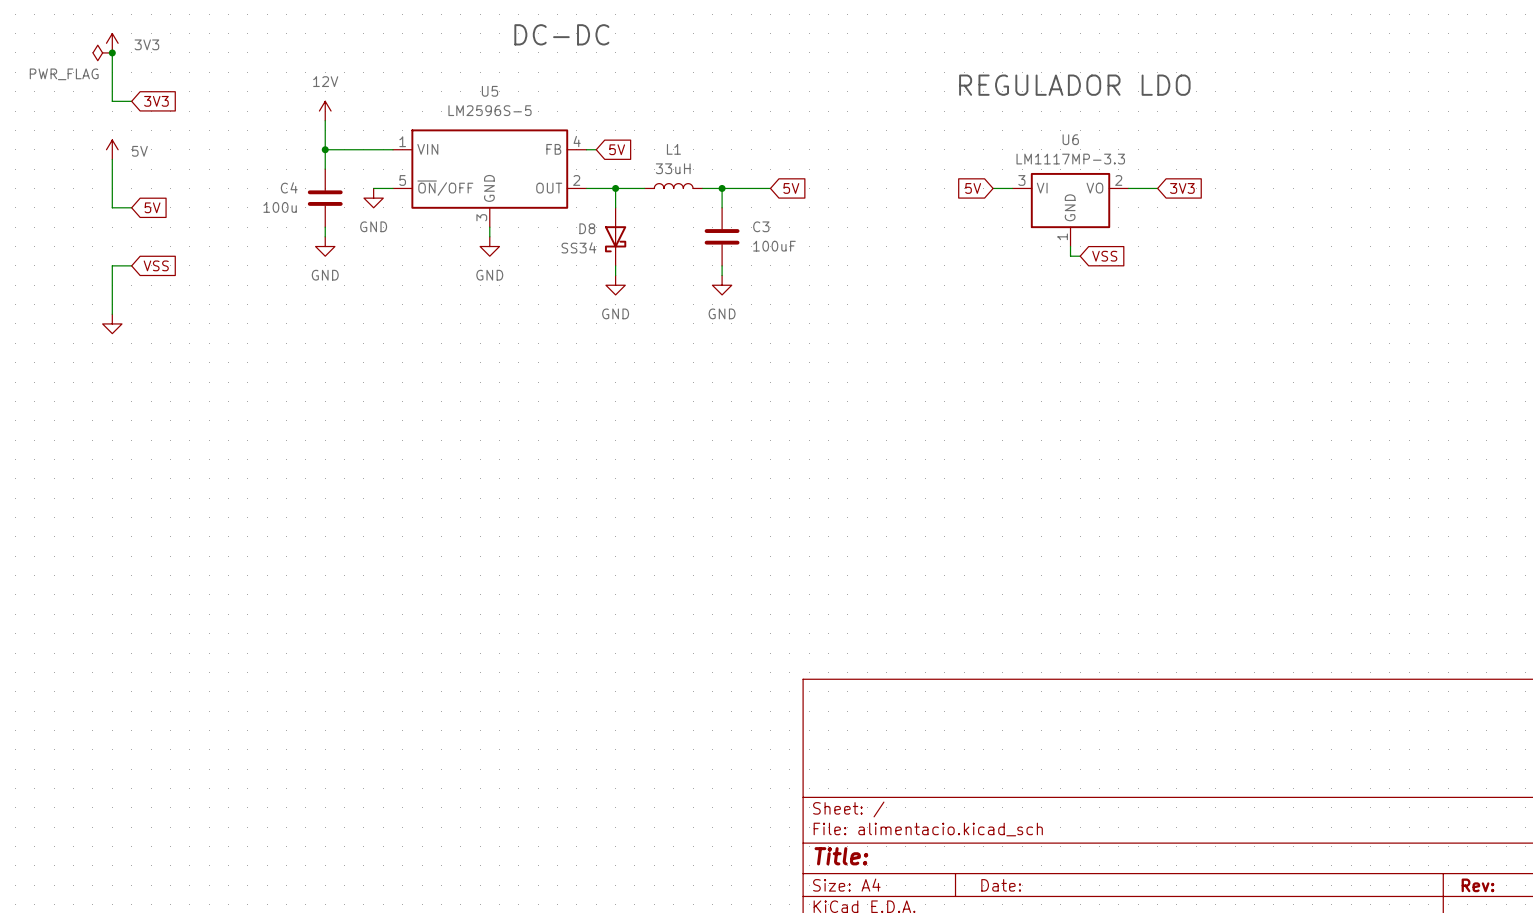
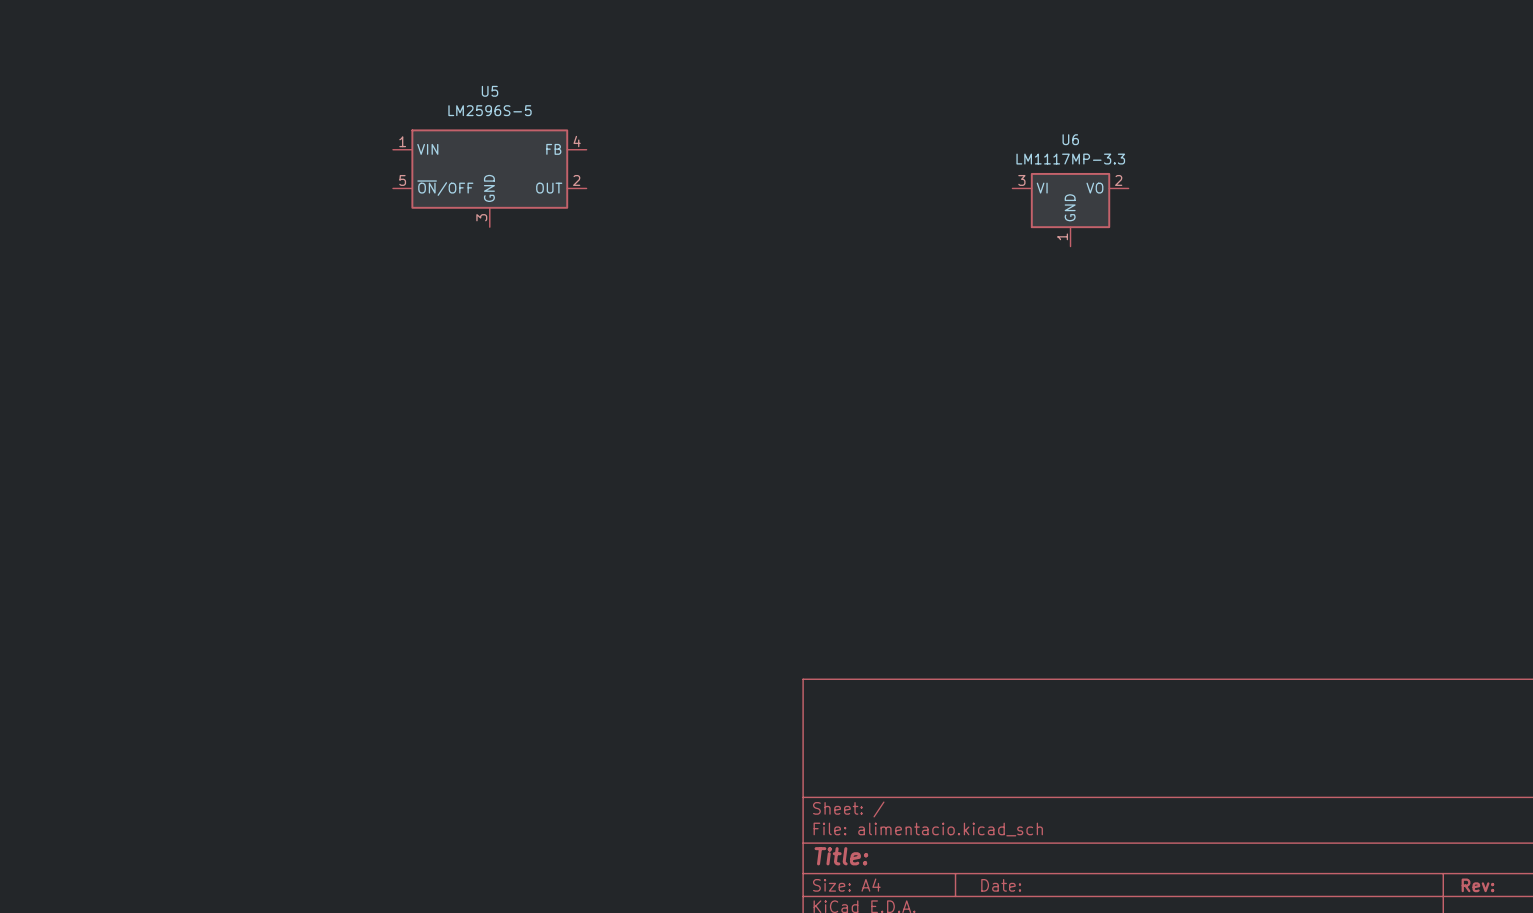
text: DC-DC (561, 34) -> none
power symbol: 3V3 (112, 43) -> none
power symbol: PWR_FLAG (102, 52) -> none
wire: (112, 52) (112, 101) (131, 101) -> none
junction: (112, 52) -> none
text: REGULADOR LDO (1074, 85) -> none
global label: 3V3 (156, 101) -> none
power symbol: 12V (325, 111) -> none
wire: (325, 120) (325, 169) -> none
power symbol: 5V (112, 149) -> none
wire: (325, 149) (393, 149) -> none
junction: (325, 149) -> none
wire: (586, 149) (596, 149) -> none
global label: 5V (617, 149) -> none
wire: (112, 159) (112, 207) (131, 207) -> none
L1: 33uH (673, 186) -> none
wire: (373, 188) (393, 188) -> none
wire: (586, 188) (644, 188) -> none
wire: (615, 188) (615, 207) -> none
junction: (615, 188) -> none
wire: (702, 188) (770, 188) -> none
wire: (722, 188) (722, 207) -> none
junction: (722, 188) -> none
global label: 5V (791, 188) -> none
global label: 5V (973, 188) -> none
wire: (993, 188) (1012, 188) -> none
wire: (1128, 188) (1157, 188) -> none
global label: 3V3 (1182, 188) -> none
C4: 100u (325, 198) -> none
power symbol: GND (373, 198) -> none
global label: 5V (152, 207) -> none
wire: (325, 227) (325, 236) -> none
wire: (489, 227) (489, 236) -> none
D8: SS34 (615, 236) -> none
C3: 100uF (722, 236) -> none
power symbol: GND (325, 246) -> none
power symbol: GND (489, 246) -> none
wire: (1070, 246) (1070, 256) (1080, 256) -> none
global label: VSS (1104, 256) -> none
wire: (131, 265) (112, 265) (112, 314) -> none
global label: VSS (156, 265) -> none
wire: (615, 265) (615, 275) -> none
wire: (722, 265) (722, 275) -> none
power symbol: GND (615, 285) -> none
power symbol: GND (722, 285) -> none
power symbol: (112, 323) -> none

